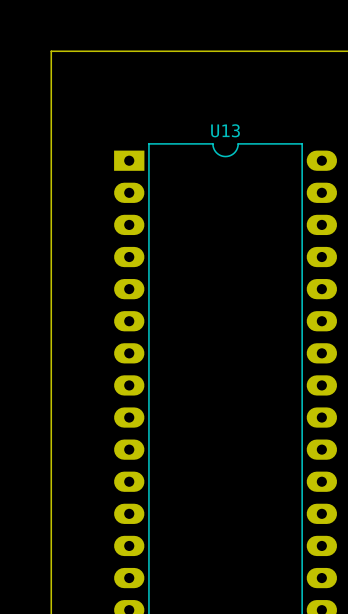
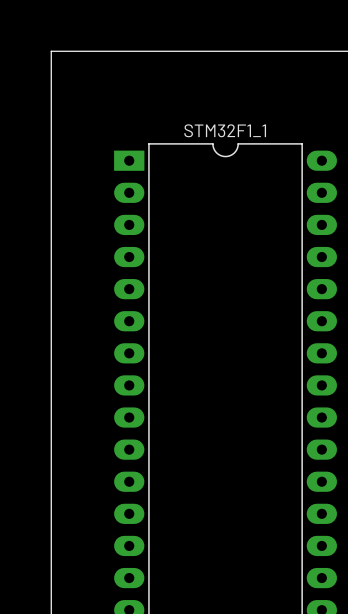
U13 name: U13 (225, 130) -> STM32F1_1 (225, 130)

